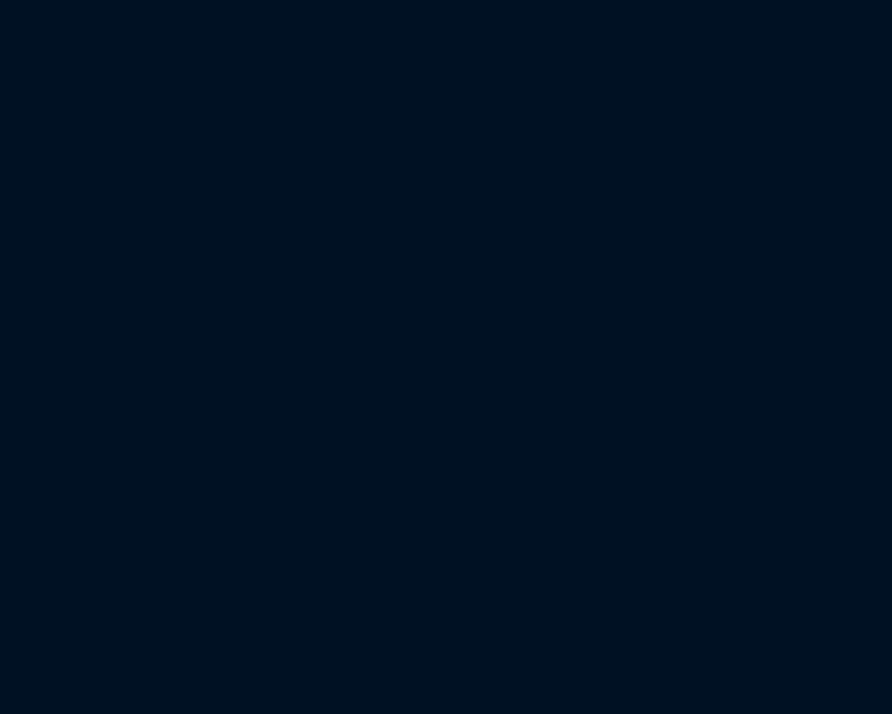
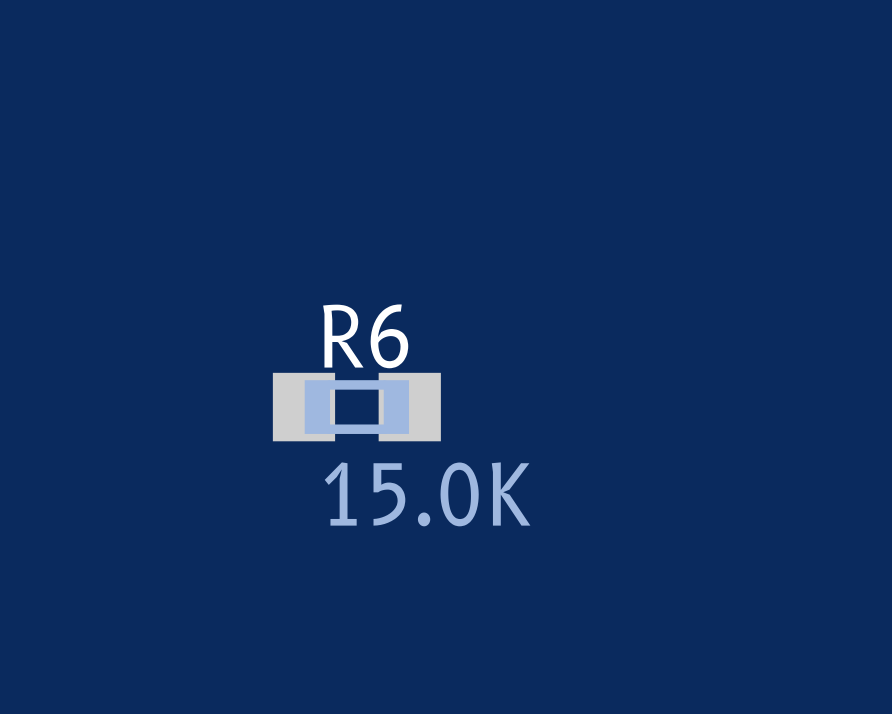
R6: none -> 15.0K (356, 407)

